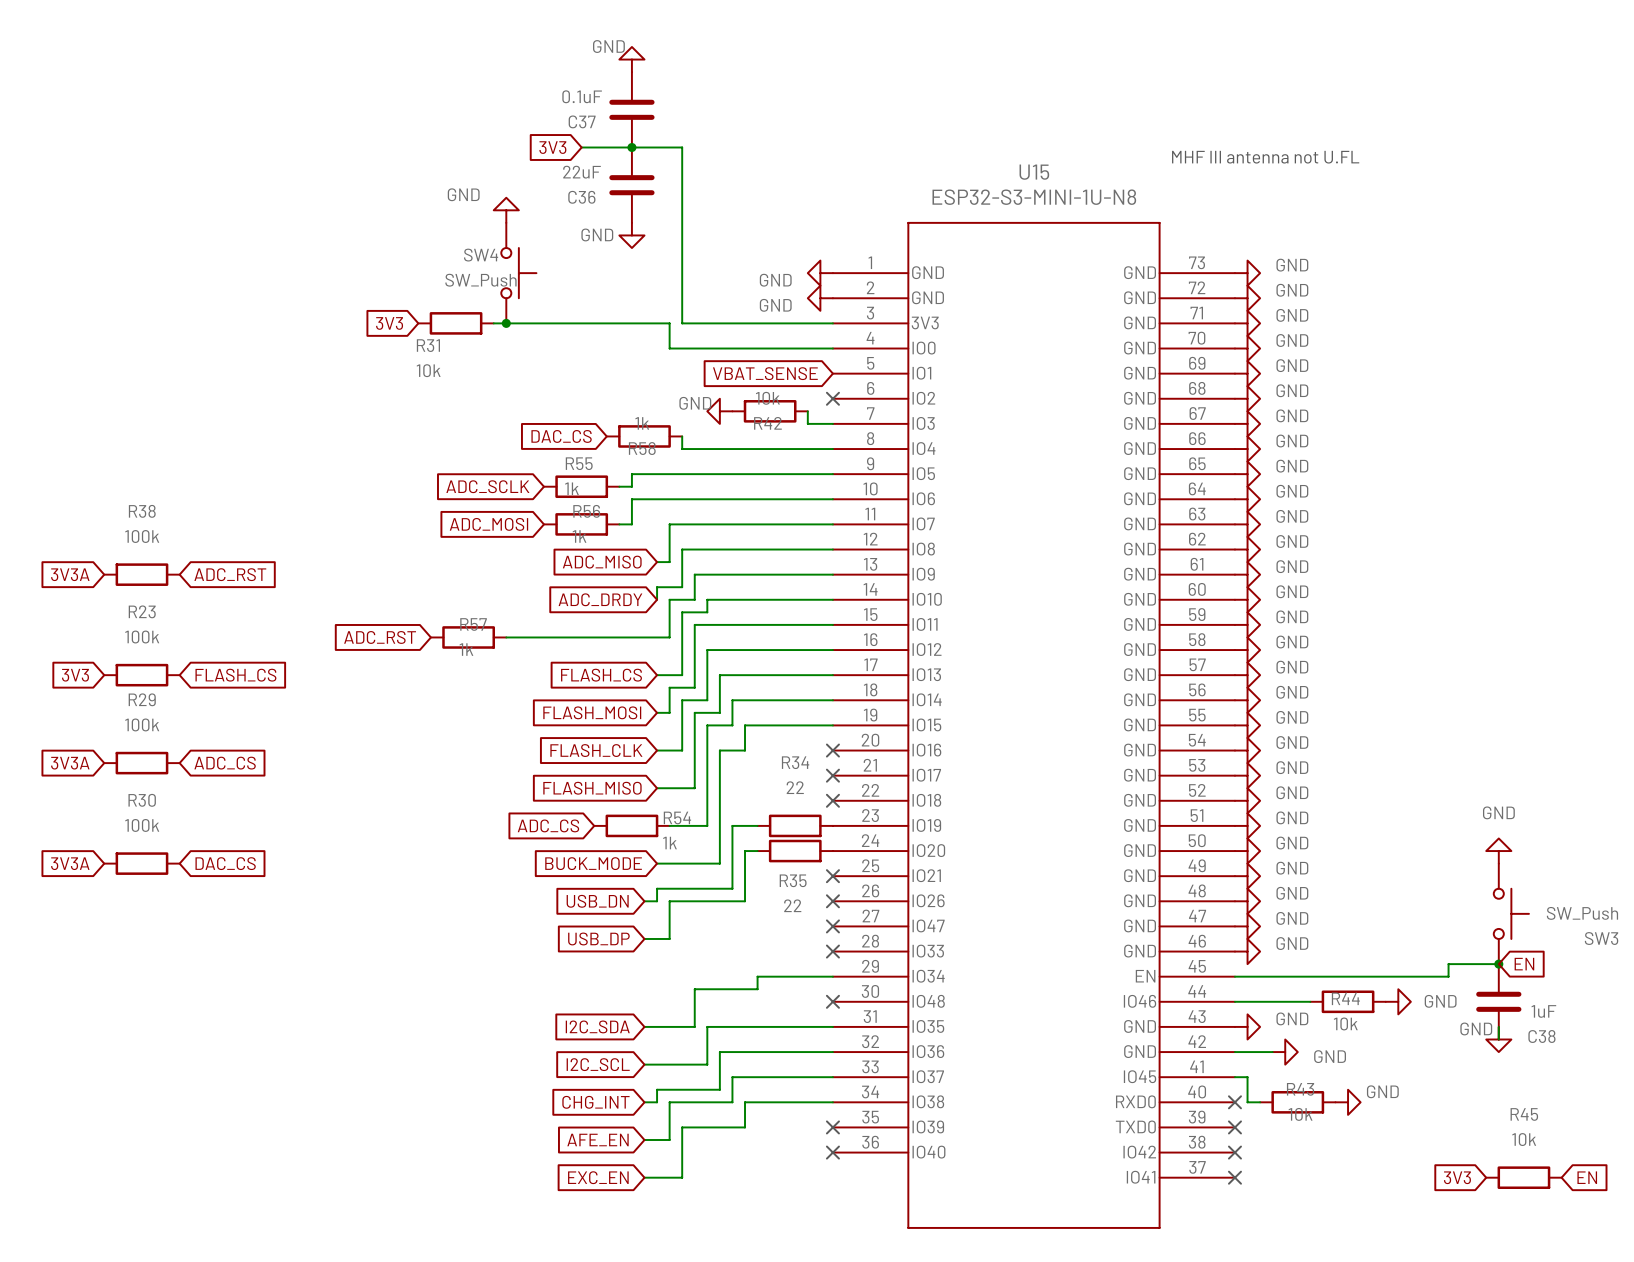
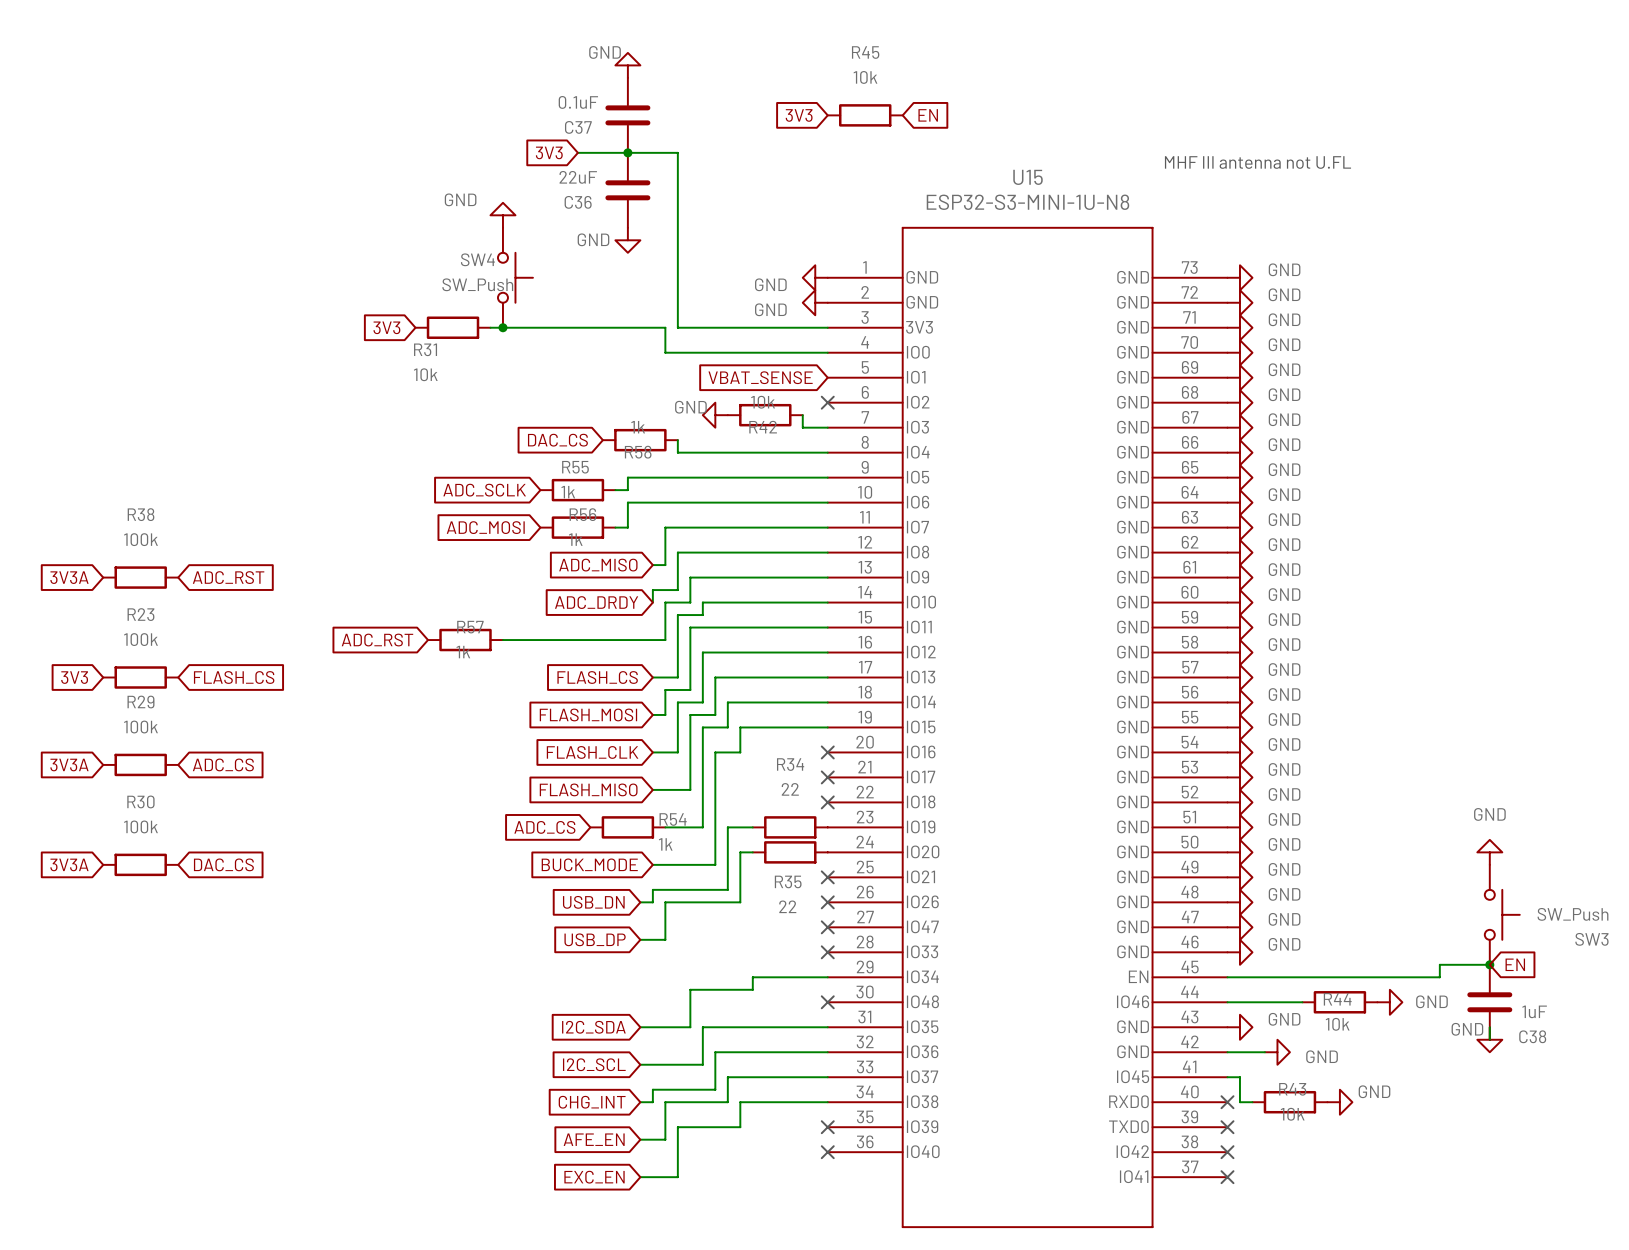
global label: none -> 3V3 (799, 115)
global label: none -> EN (928, 115)
global label: 3V3 (1457, 1177) -> none
R45 position: (1523, 1177) -> (865, 115)
global label: EN (1587, 1177) -> none

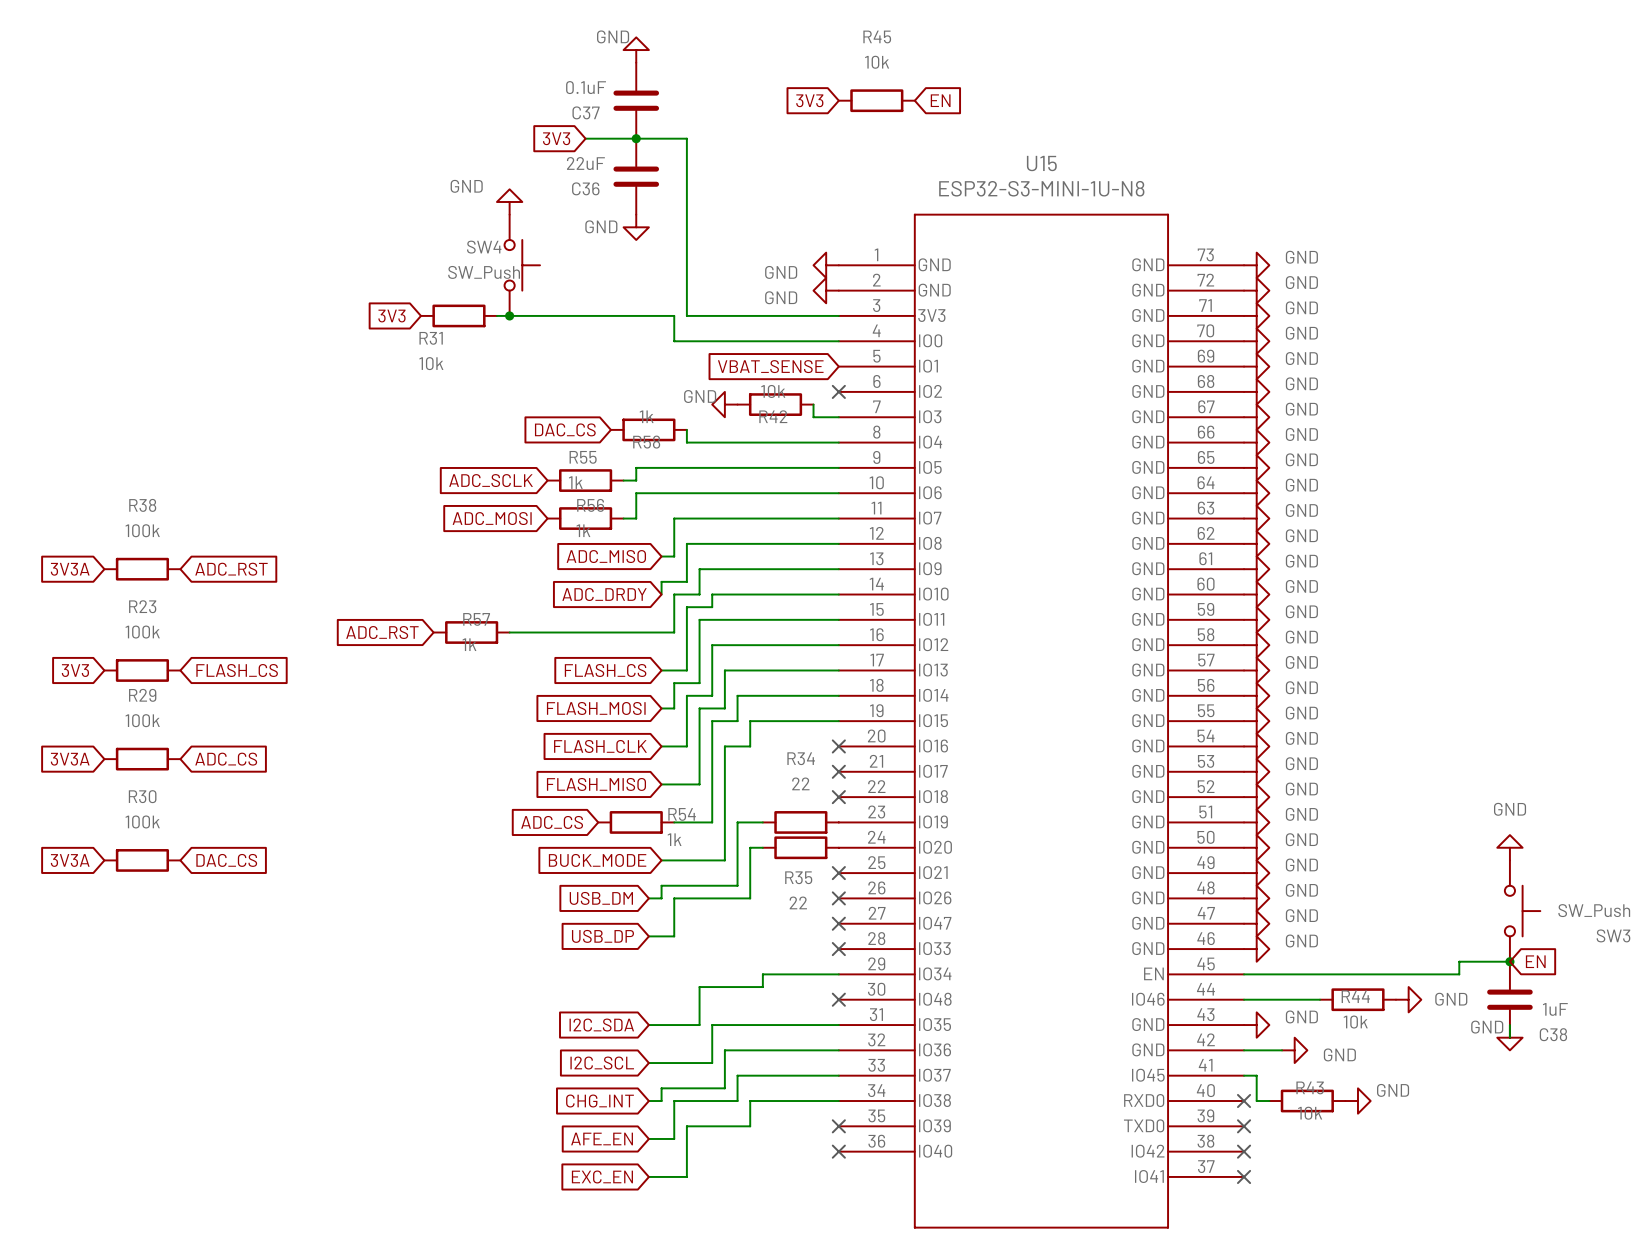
text: MHF III antenna not U.FL (1257, 162) -> none
global label: USB_DN (593, 902) -> USB_DM (601, 898)

